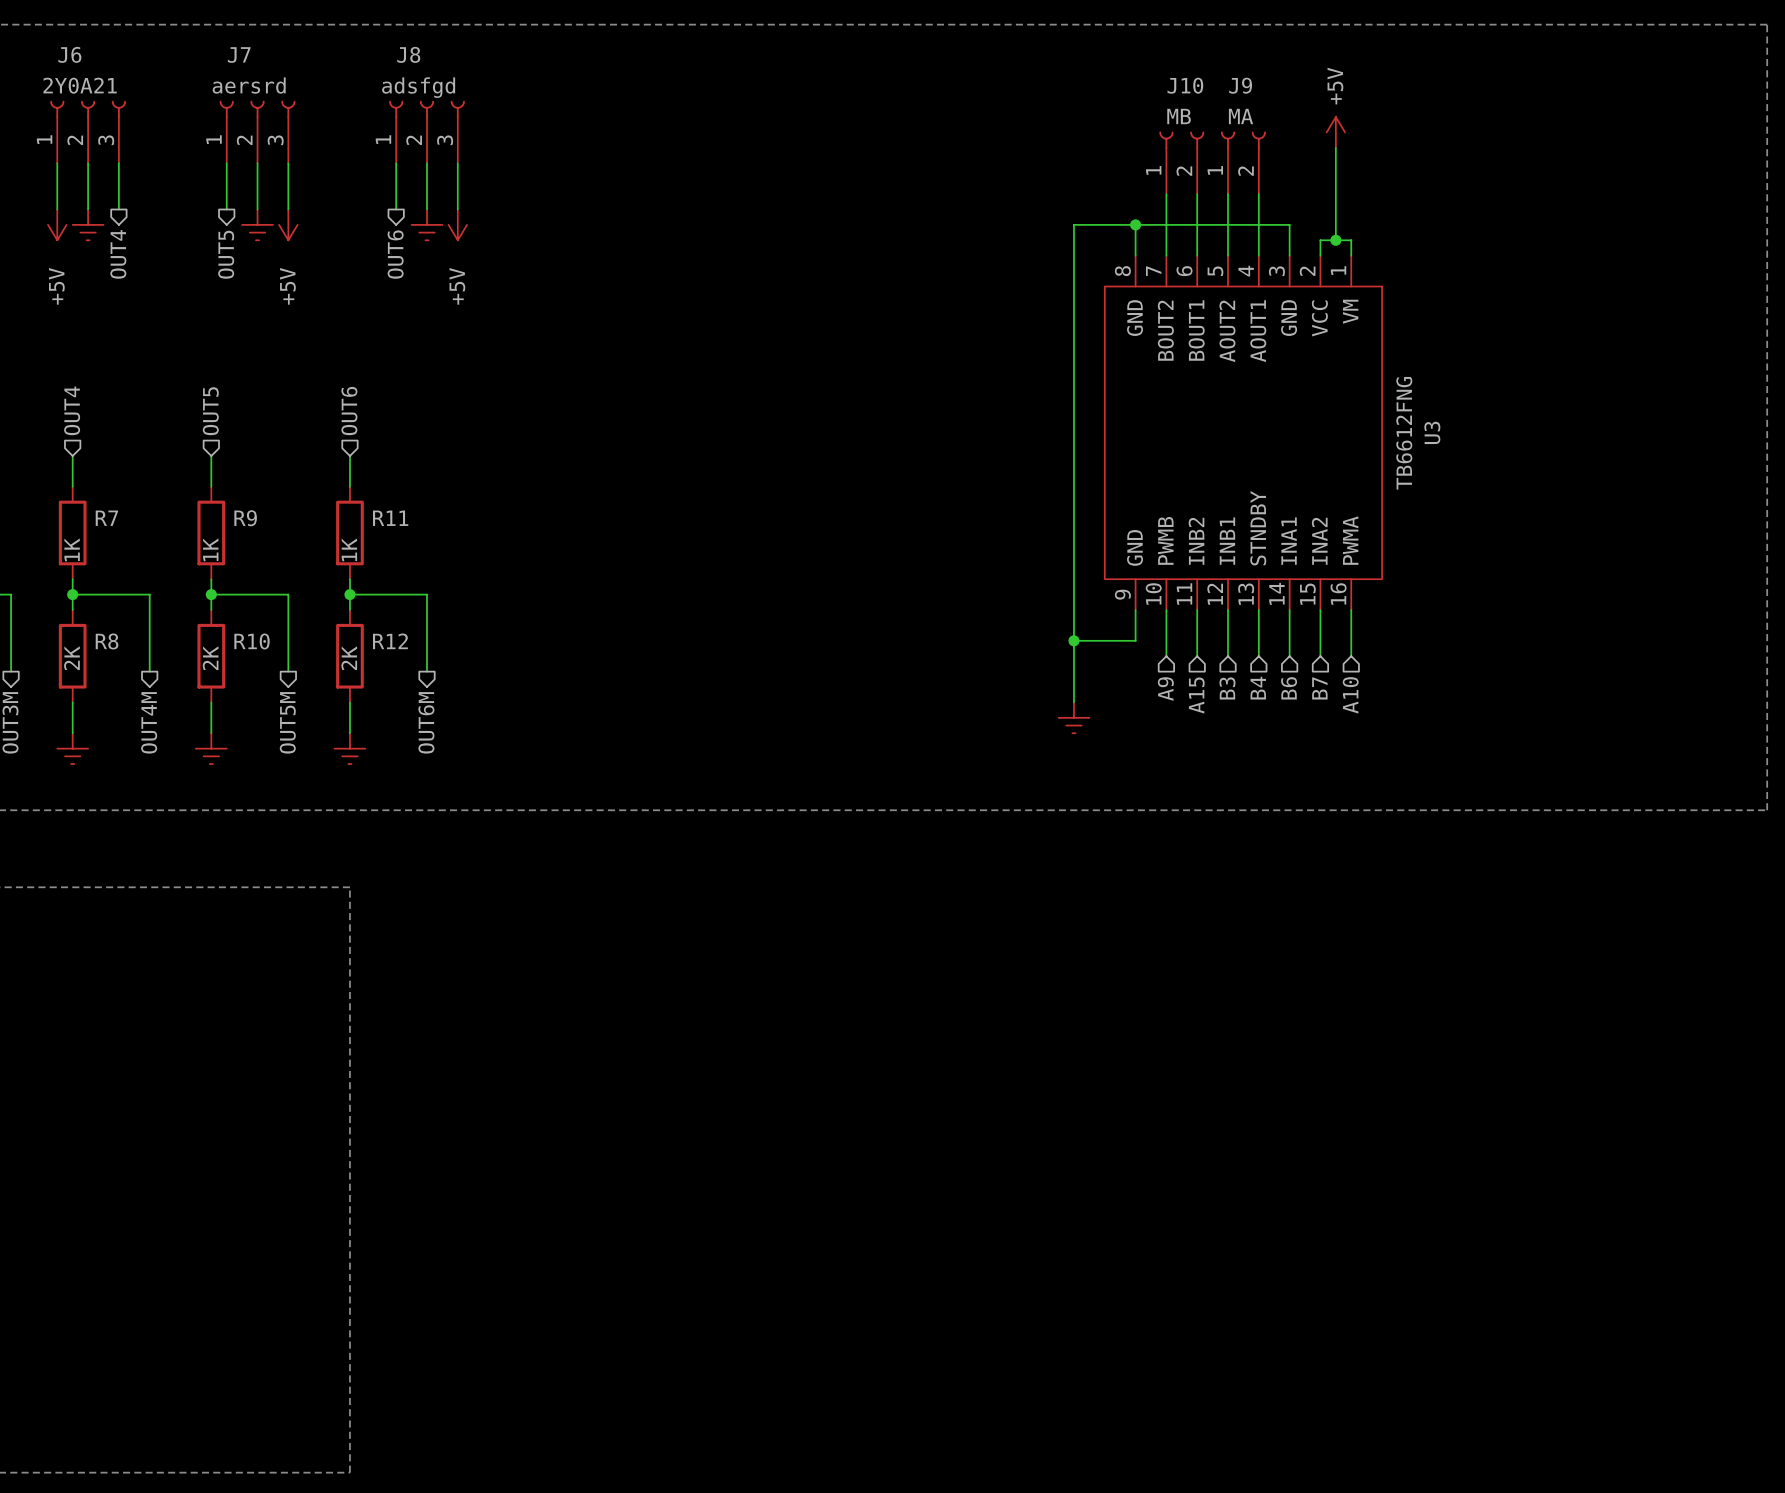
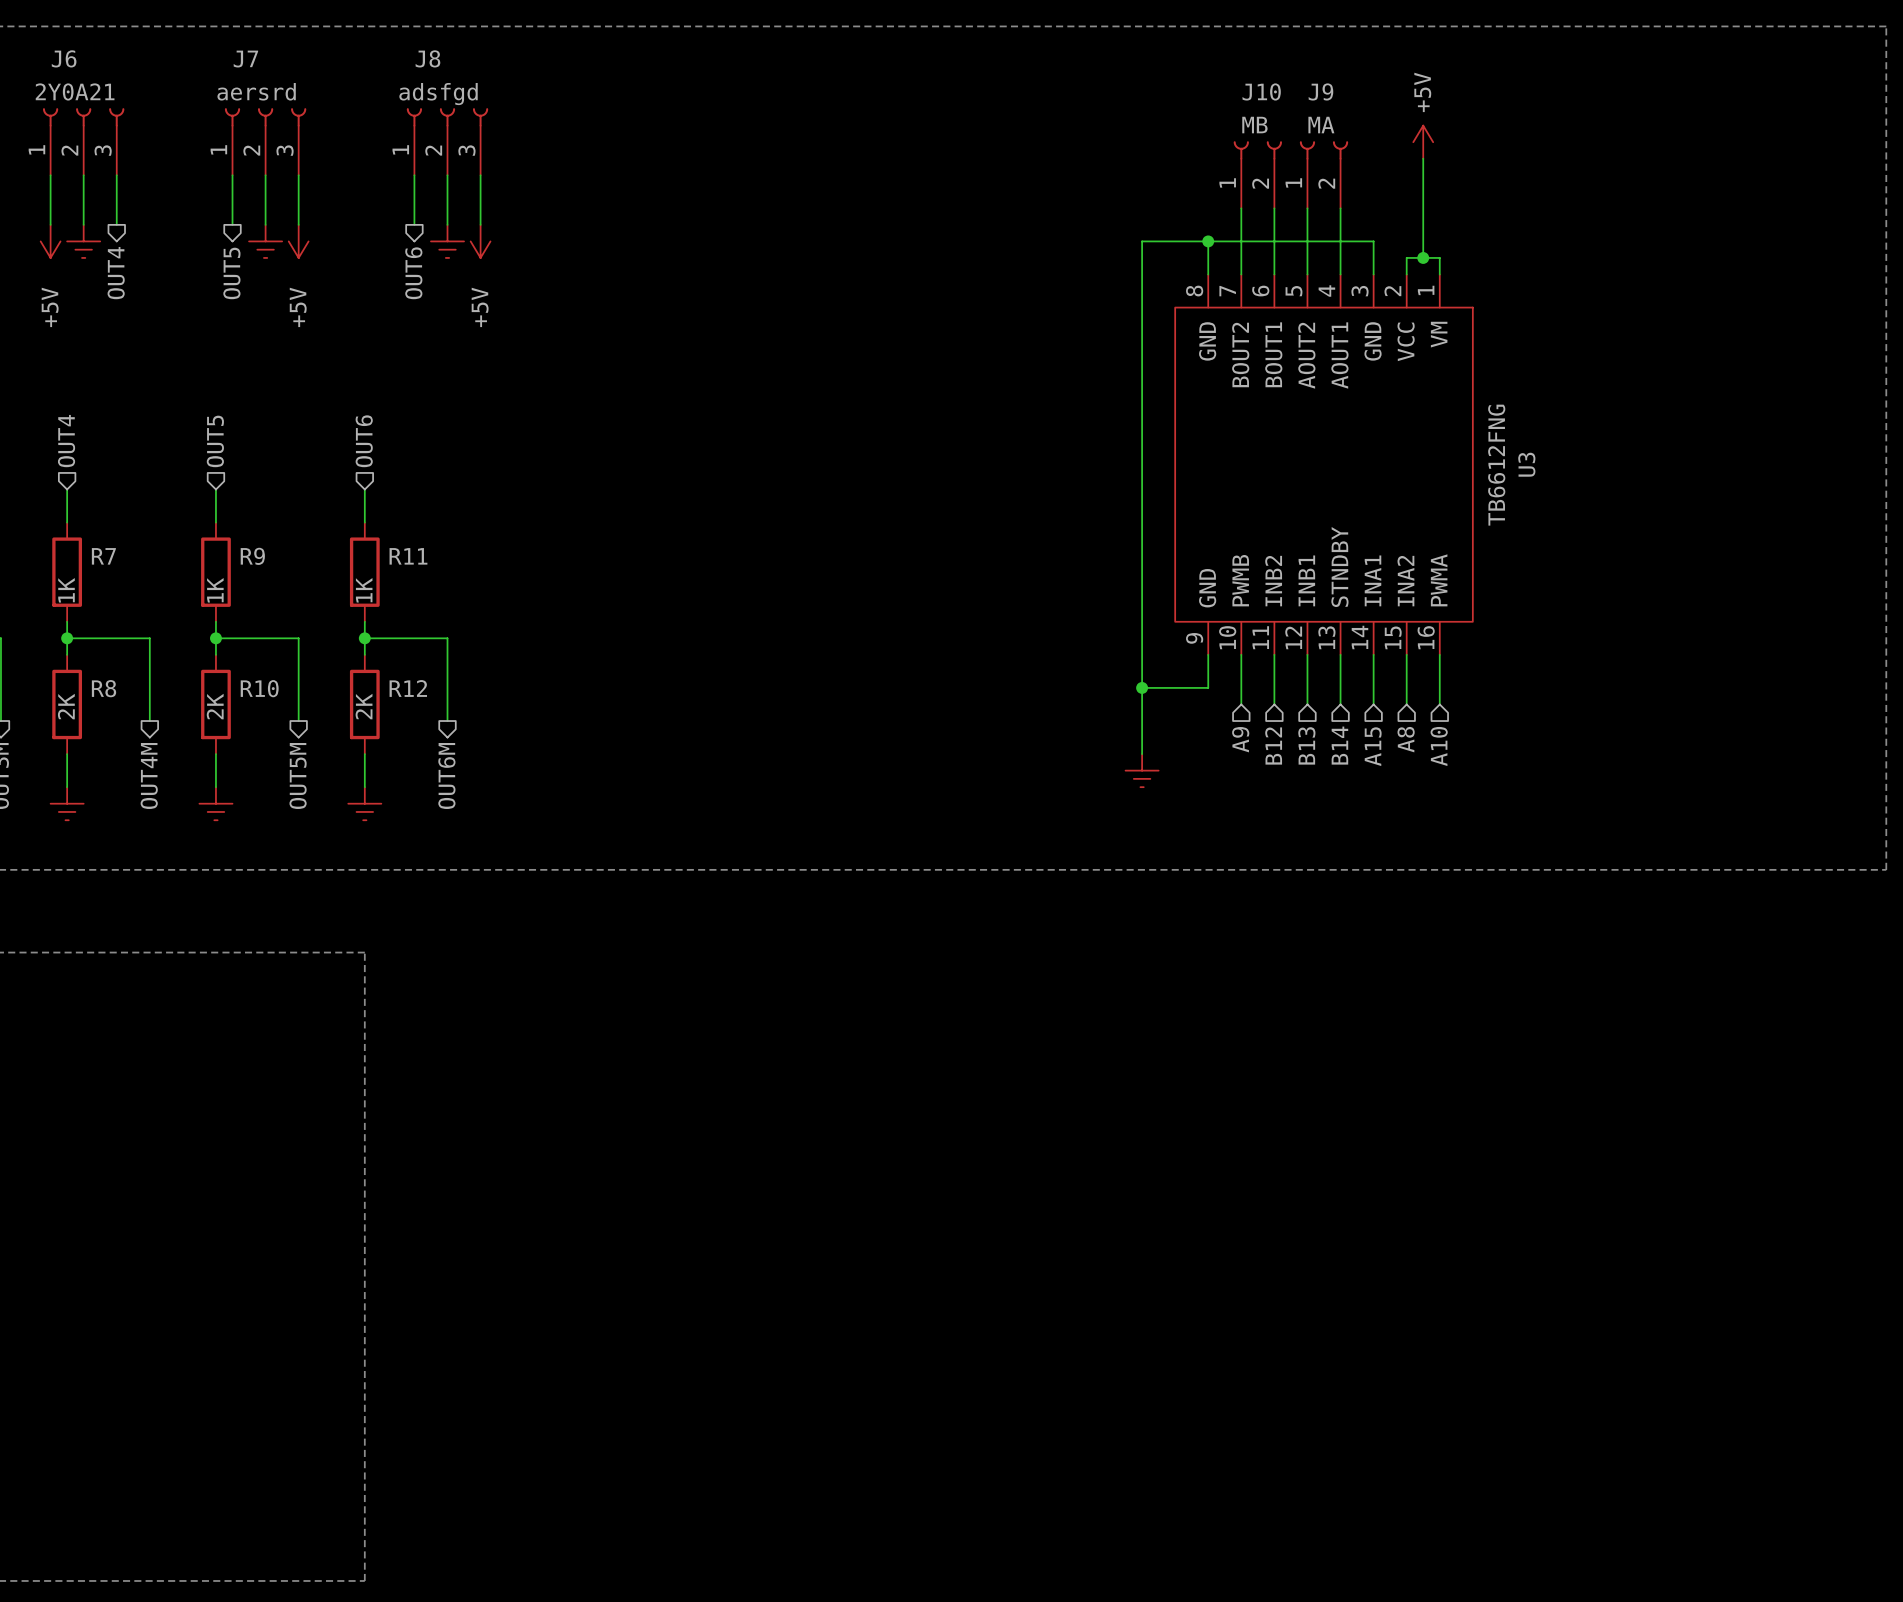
hierarchical label: B3 (1227, 688) -> B13 (1306, 745)
hierarchical label: B4 (1258, 688) -> B14 (1339, 745)
hierarchical label: B6 (1289, 688) -> A15 (1373, 746)
hierarchical label: B7 (1319, 688) -> A8 (1406, 739)
hierarchical label: A15 (1196, 695) -> B12 (1273, 746)

